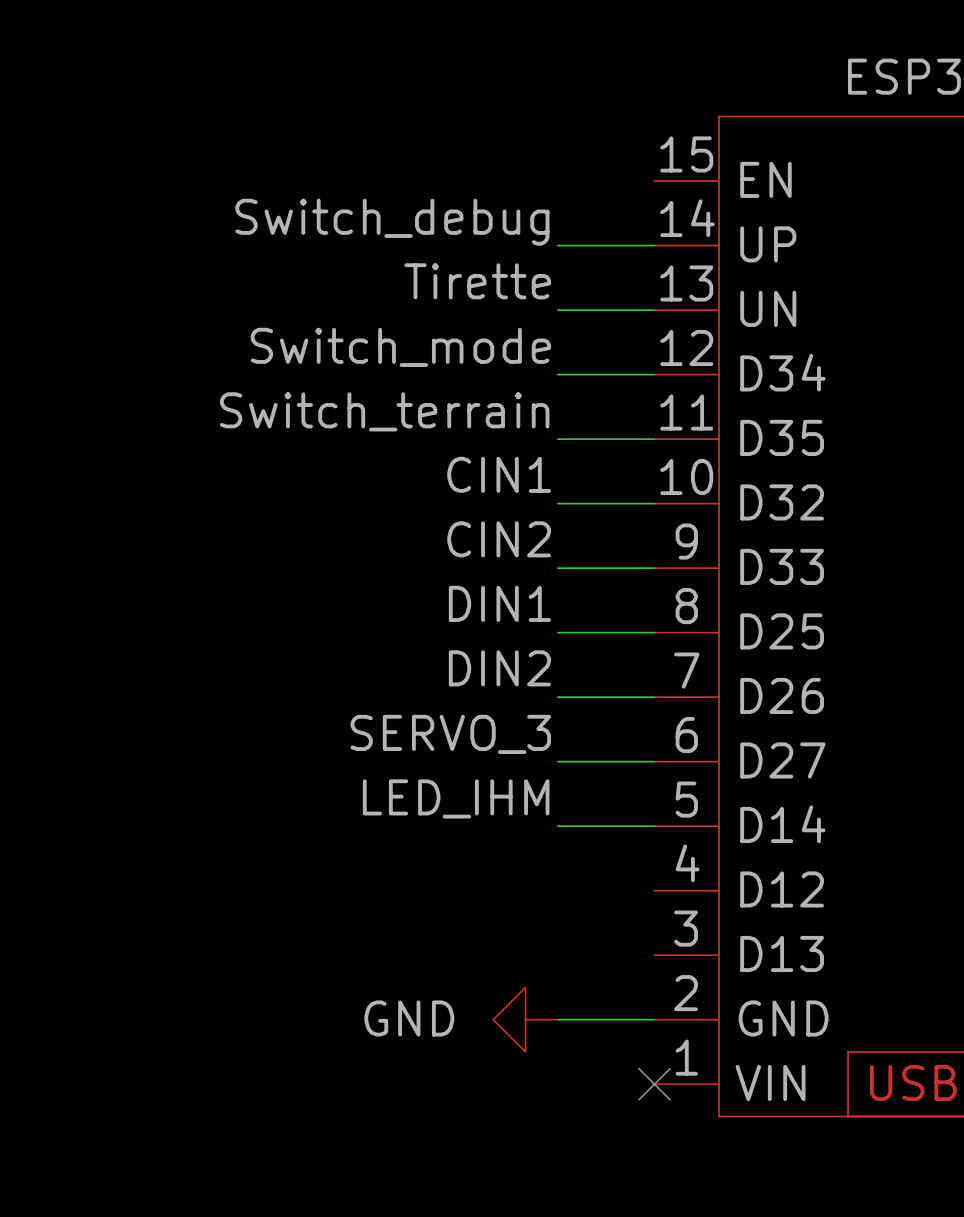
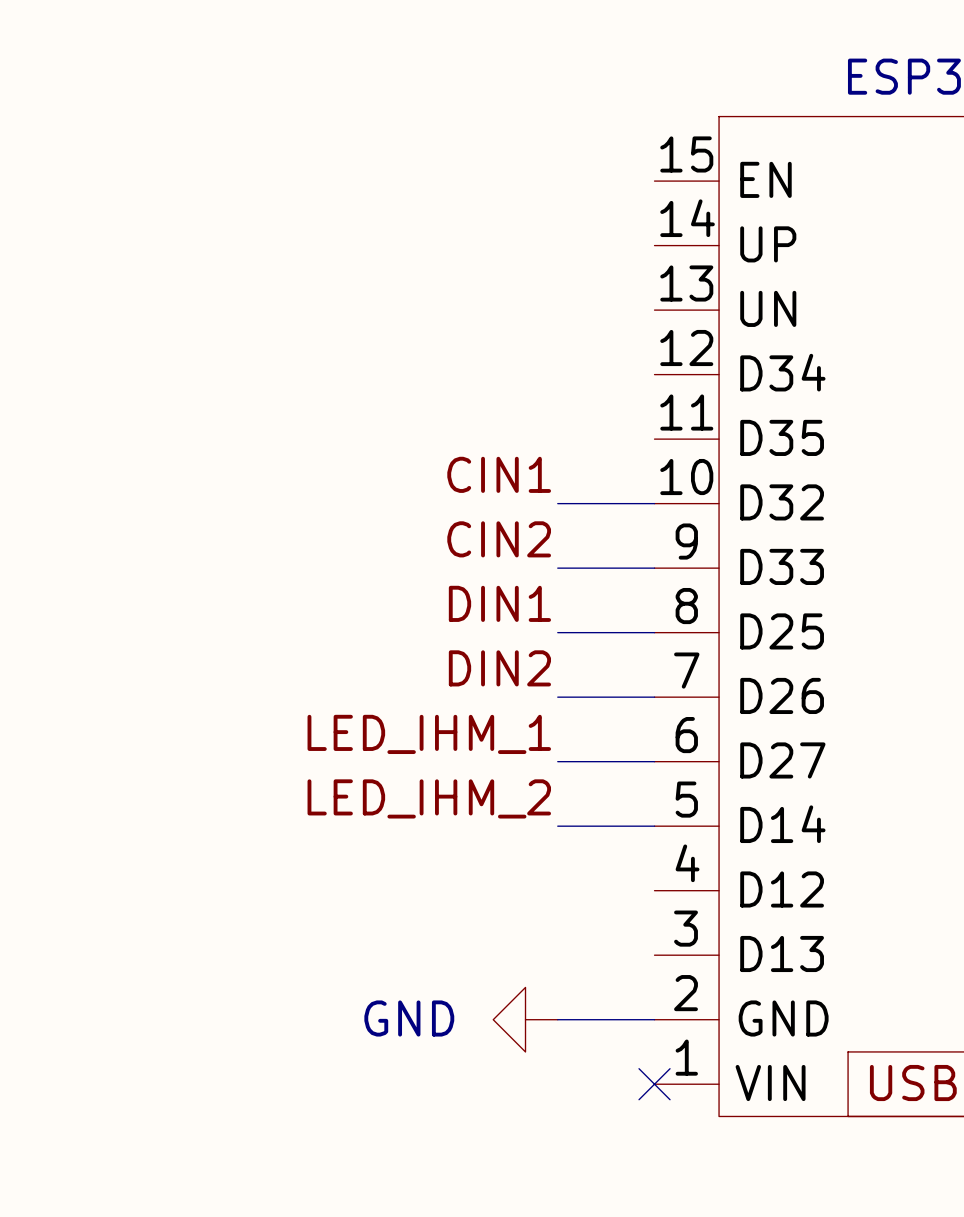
label: Switch_debug (392, 222) -> none
wire: (557, 245) (654, 245) -> none
label: Tirette (477, 281) -> none
wire: (557, 310) (654, 310) -> none
label: Switch_mode (400, 347) -> none
wire: (557, 374) (654, 374) -> none
label: Switch_terrain (384, 411) -> none
wire: (557, 439) (654, 439) -> none
label: SERVO_3 (450, 734) -> LED_IHM_1 (429, 734)
label: LED_IHM (456, 798) -> LED_IHM_2 (429, 798)

